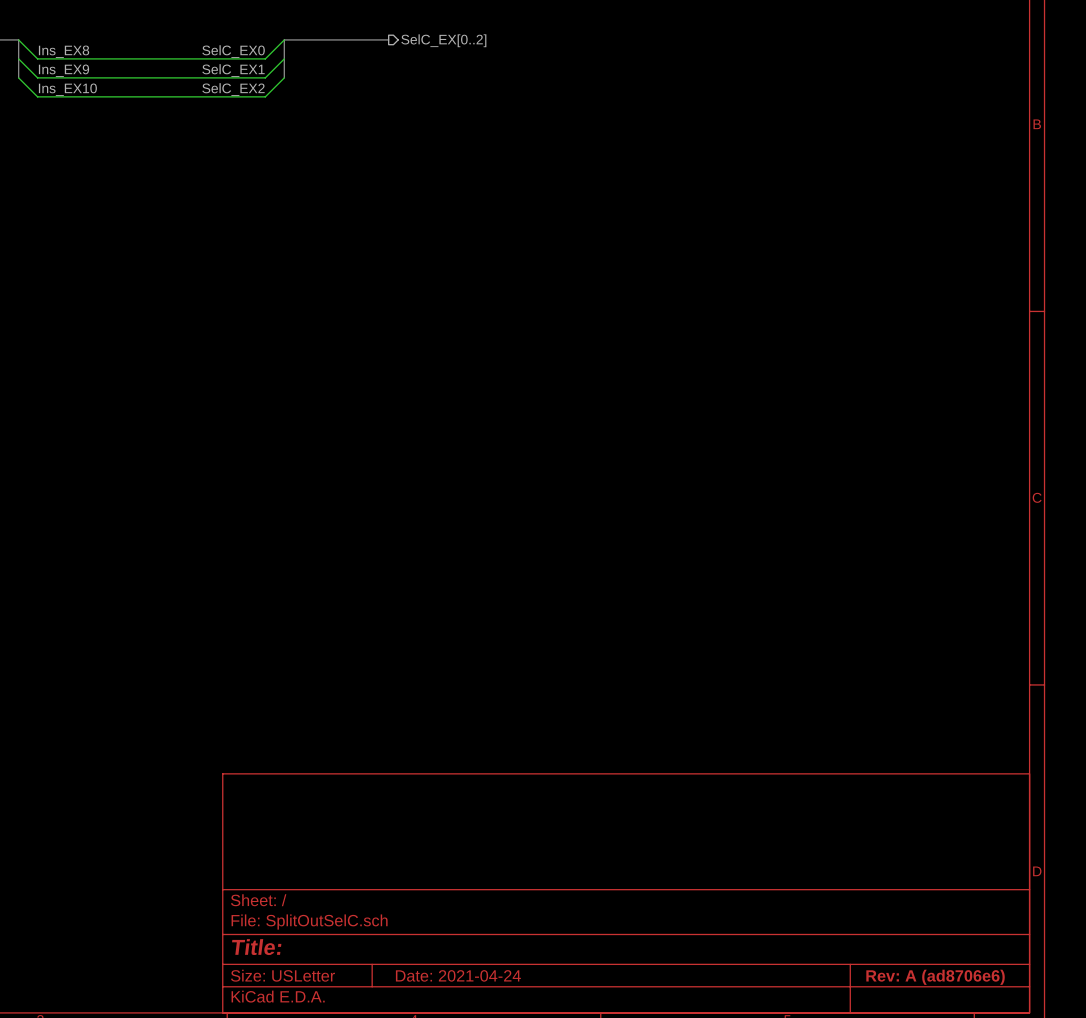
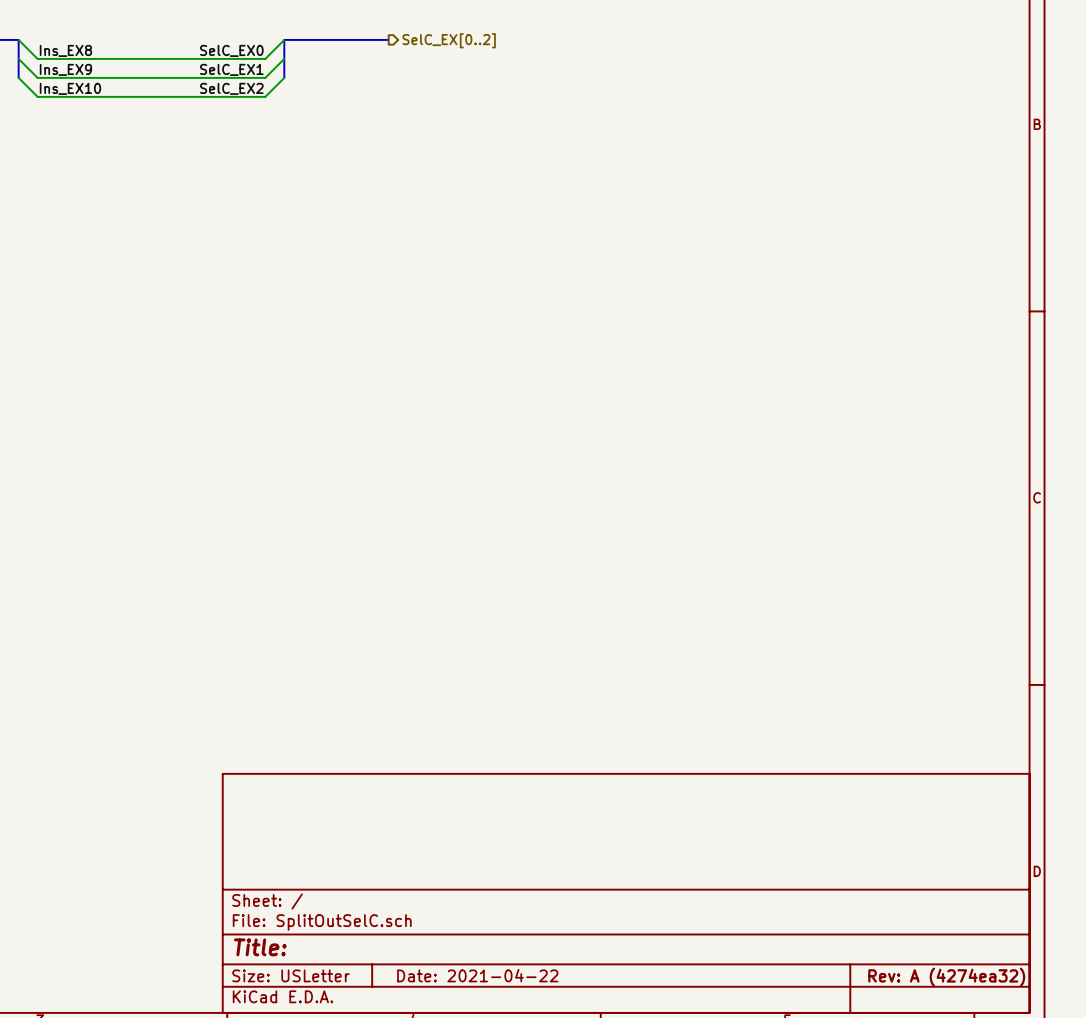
title block: Date: 2021-04-24 (458, 975) -> Date: 2021-04-22 (477, 975)
title block: Rev: A (ad8706e6) (935, 977) -> Rev: A (4274ea32) (946, 977)

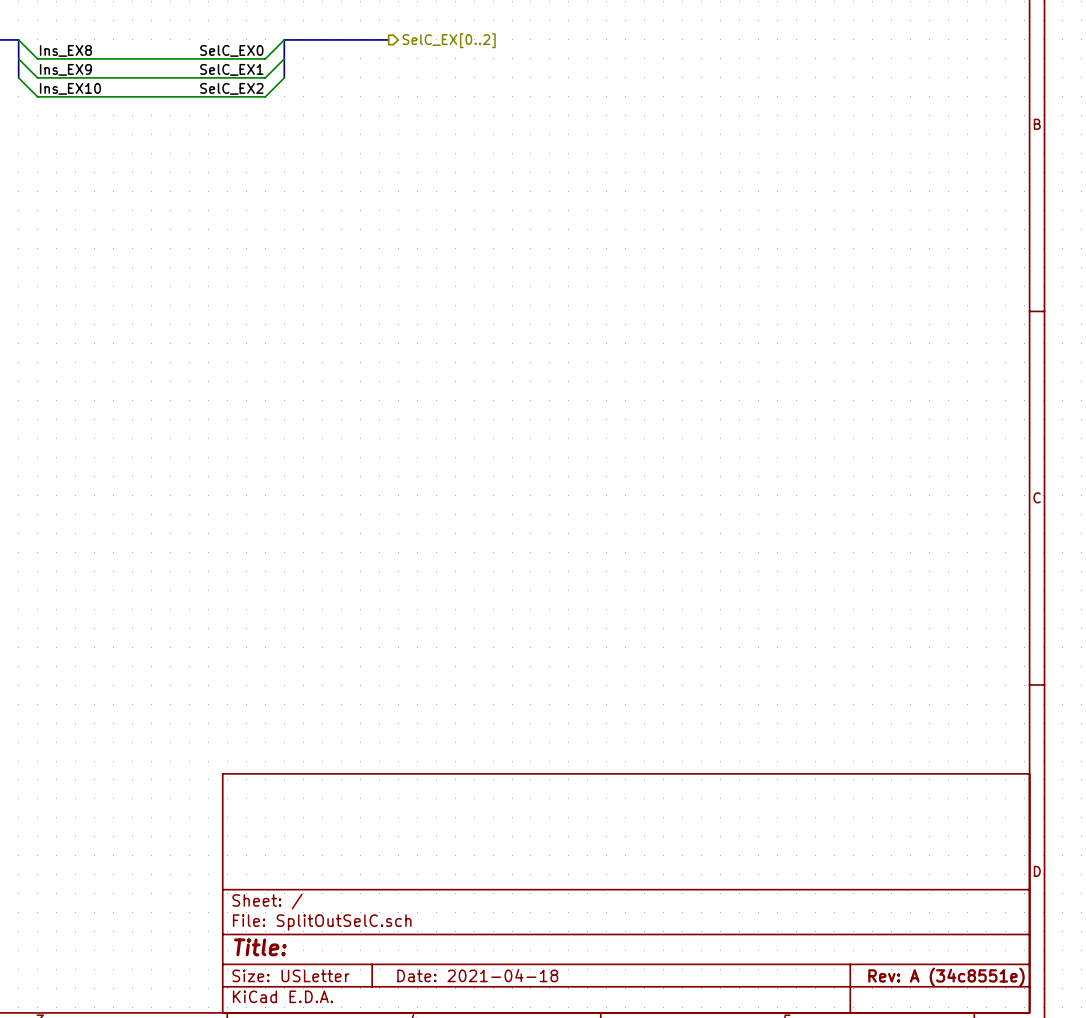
title block: Date: 2021-04-22 (477, 975) -> Date: 2021-04-18 (477, 975)
title block: Rev: A (4274ea32) (946, 977) -> Rev: A (34c8551e) (946, 977)

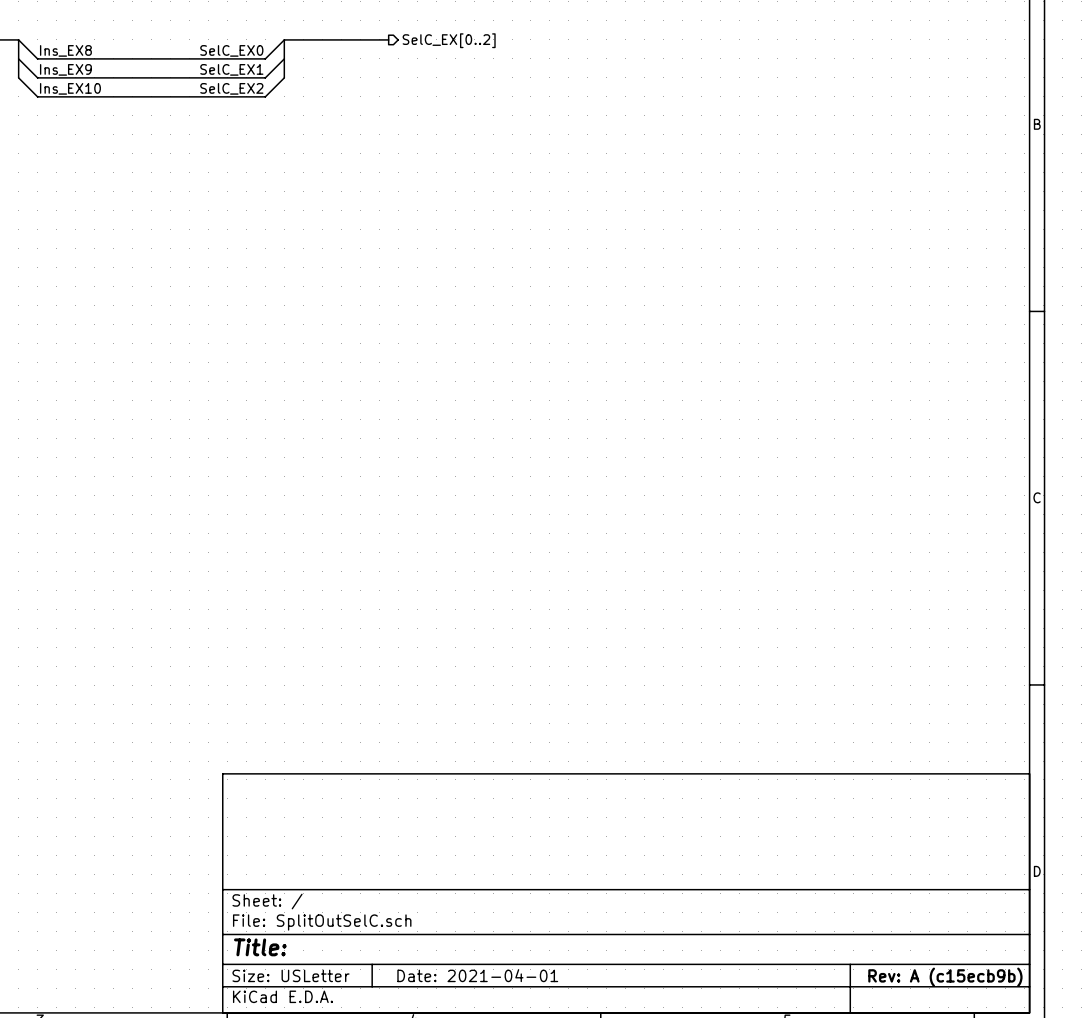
title block: Date: 2021-04-18 (477, 975) -> Date: 2021-04-01 (477, 975)
title block: Rev: A (34c8551e) (946, 977) -> Rev: A (c15ecb9b) (945, 977)

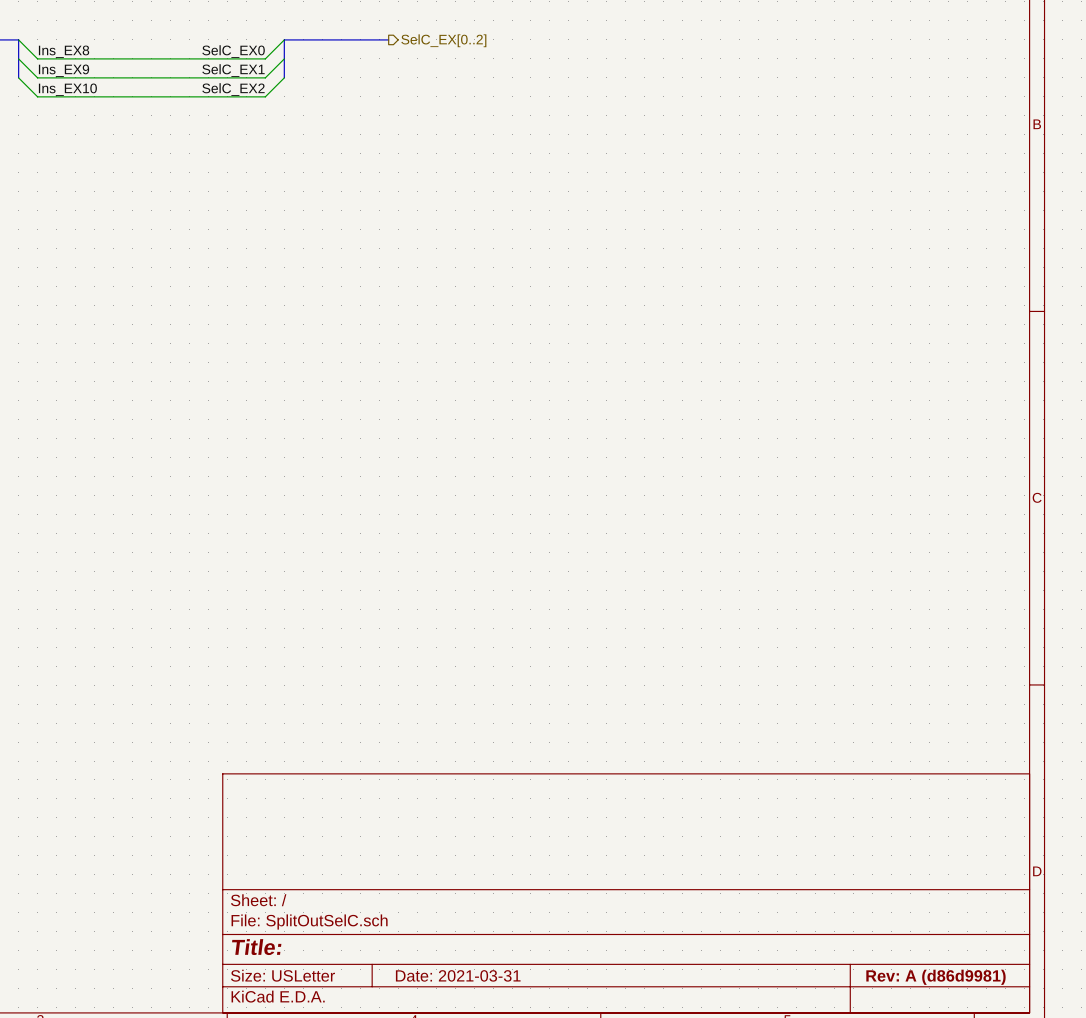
title block: Date: 2021-04-01 (477, 975) -> Date: 2021-03-31 (458, 975)
title block: Rev: A (c15ecb9b) (945, 977) -> Rev: A (d86d9981) (935, 977)

